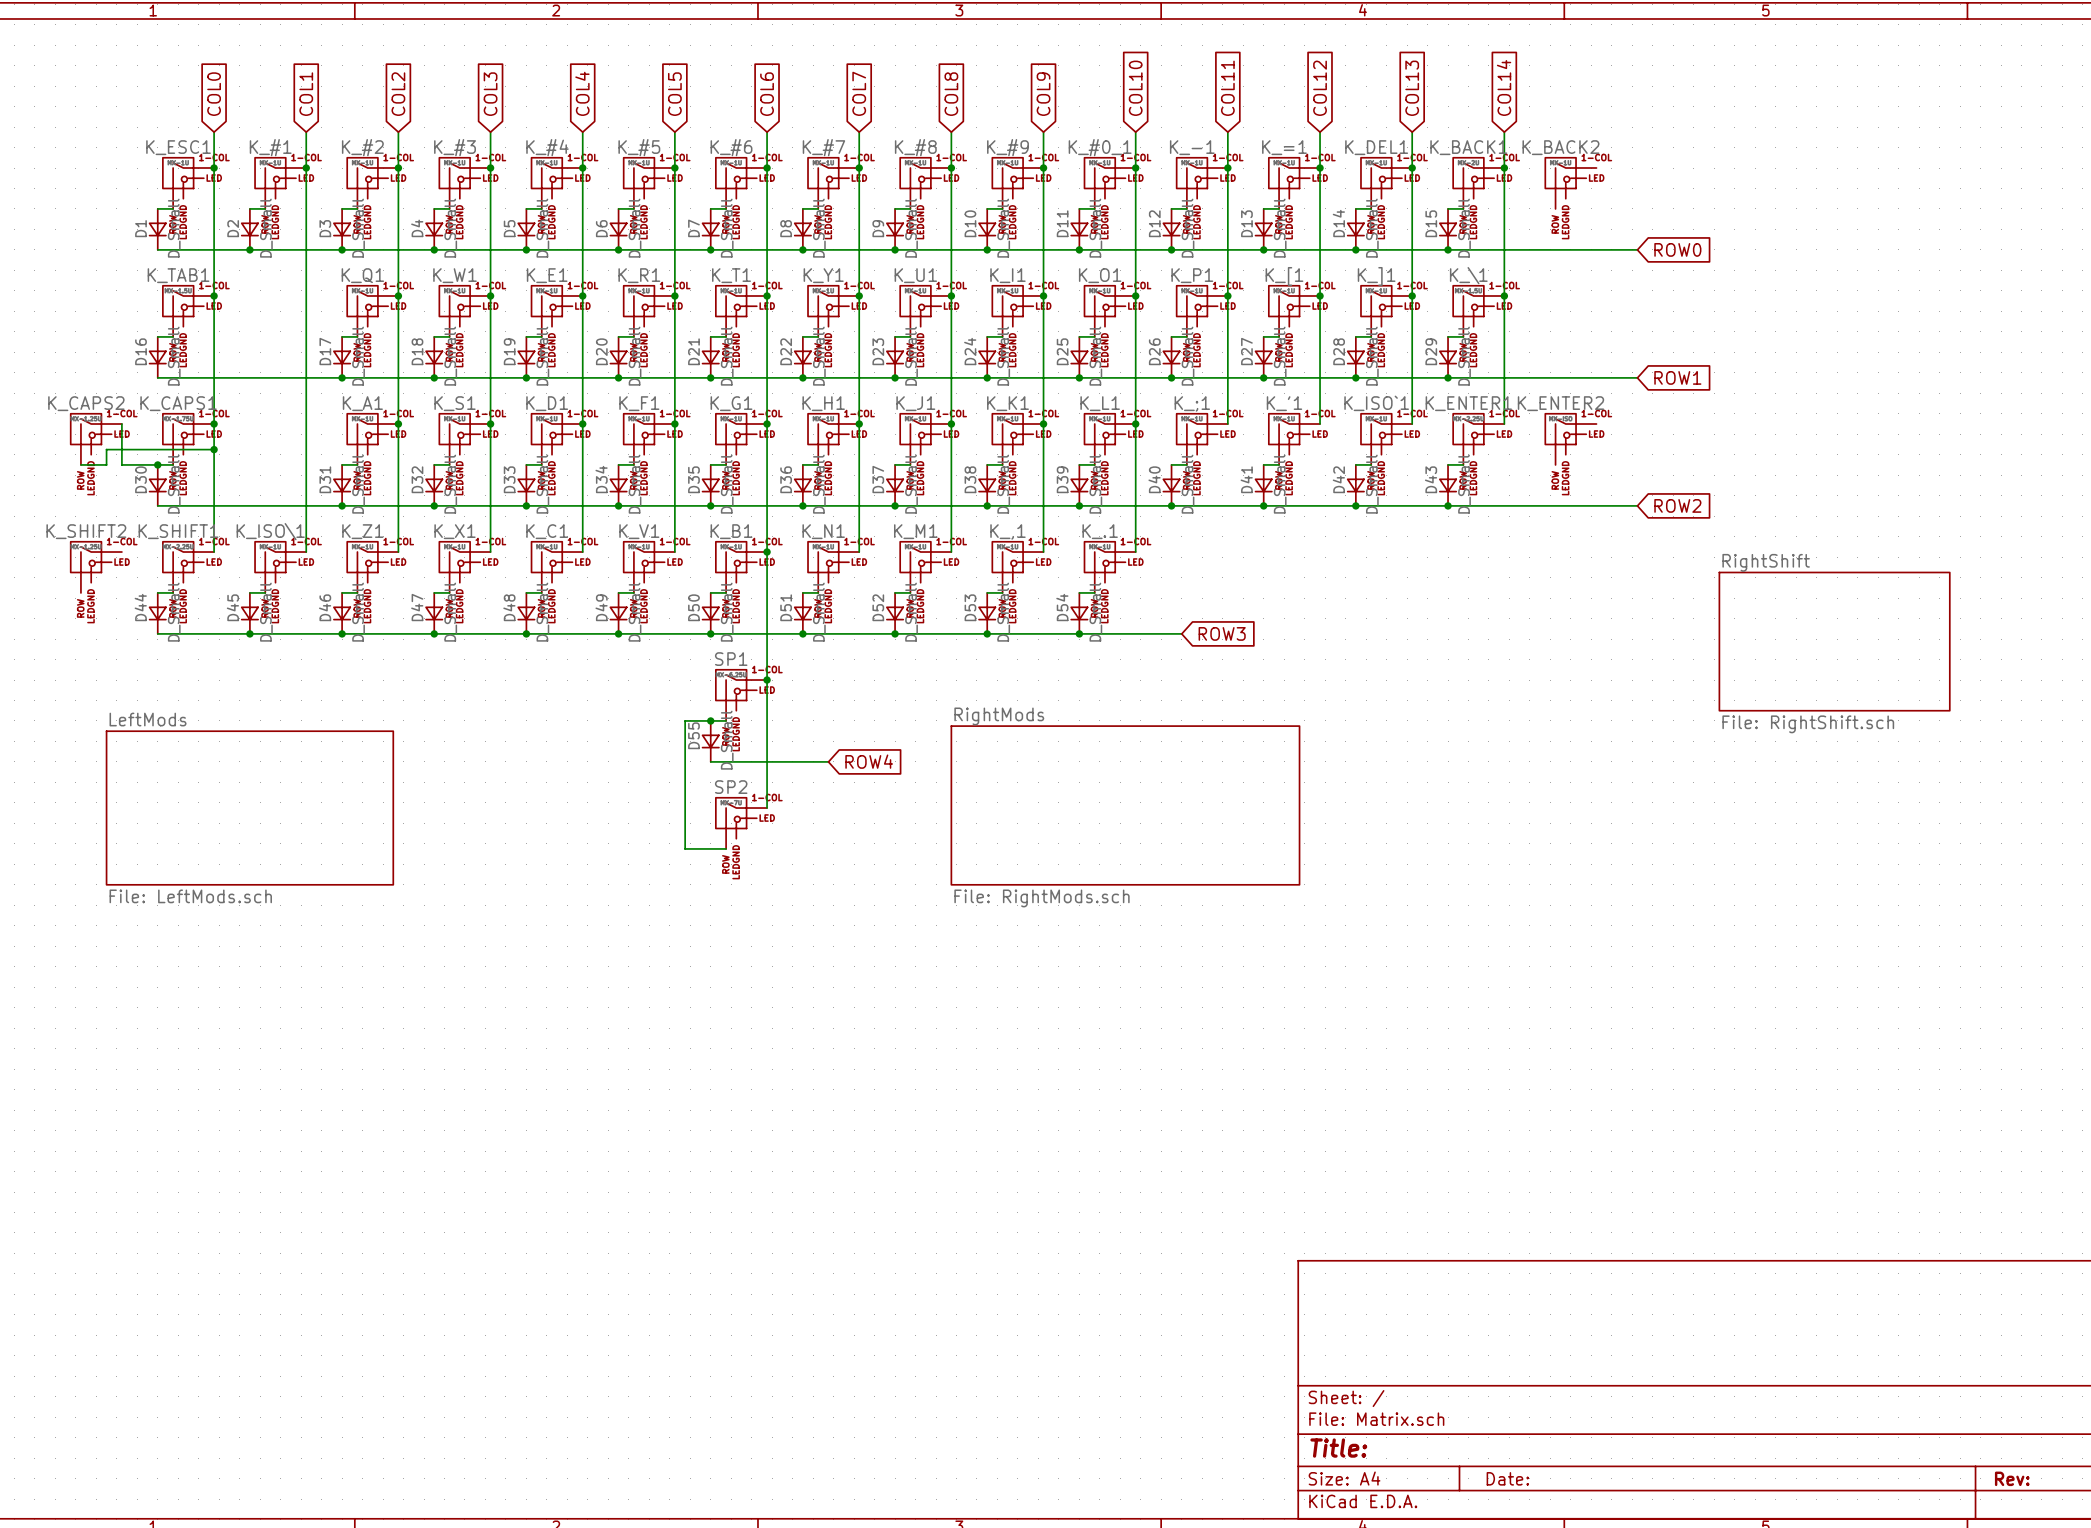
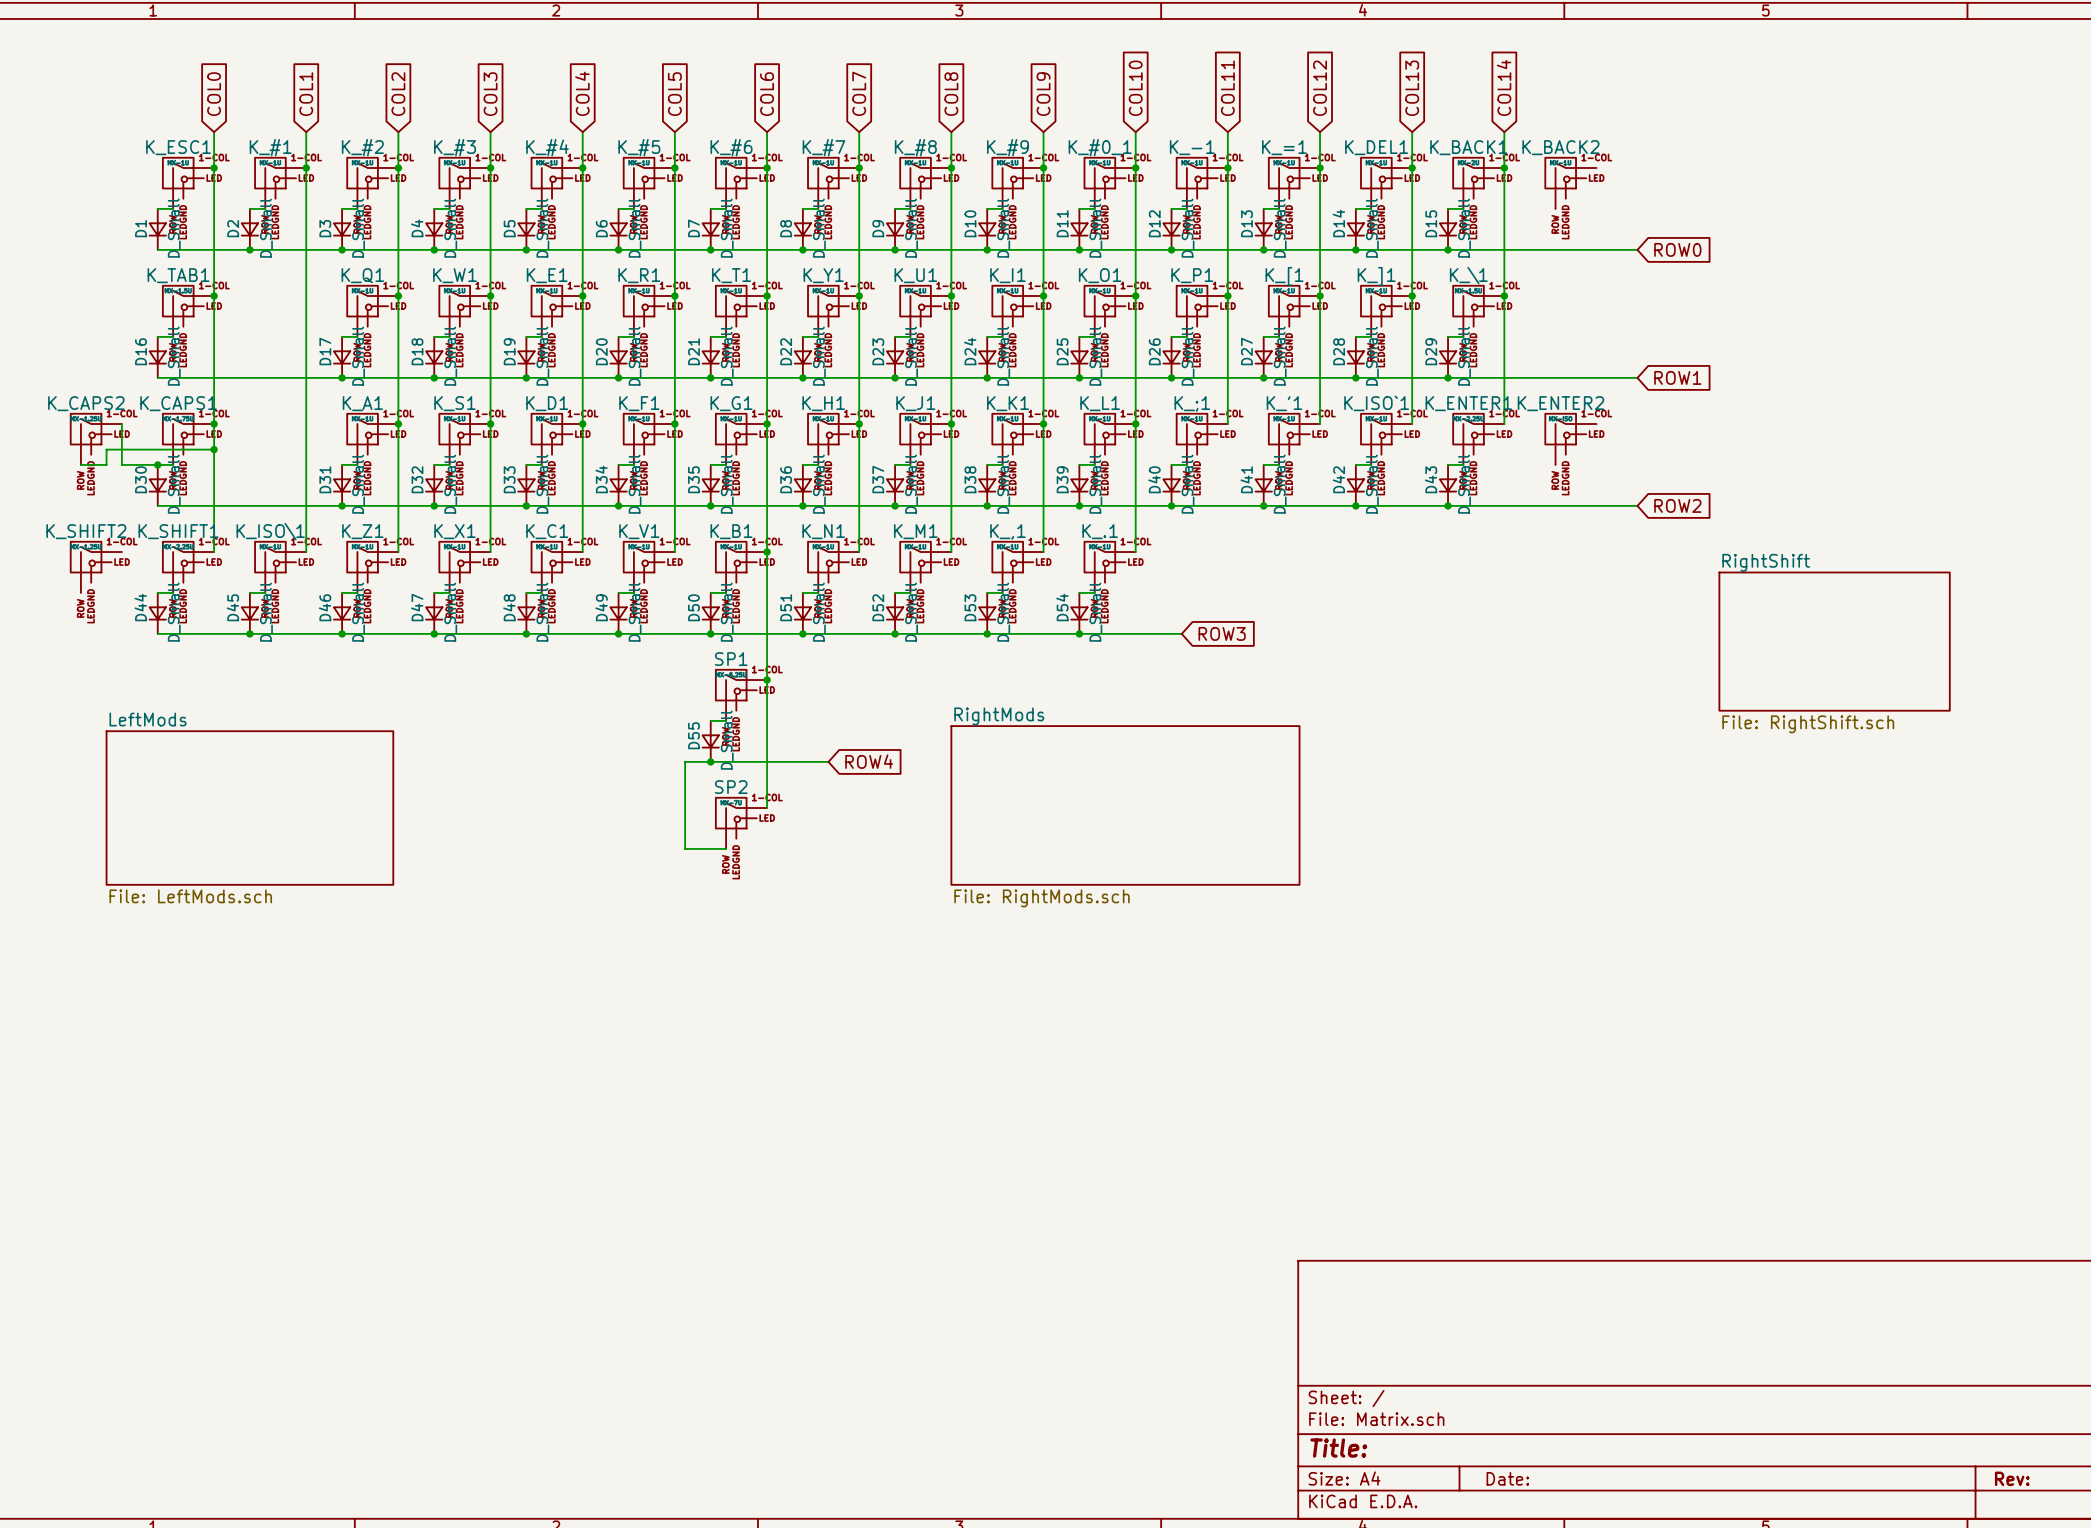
wire: (710, 720) (685, 720) (685, 761) -> (710, 761) (685, 761)
junction position: (710, 720) -> (710, 761)

